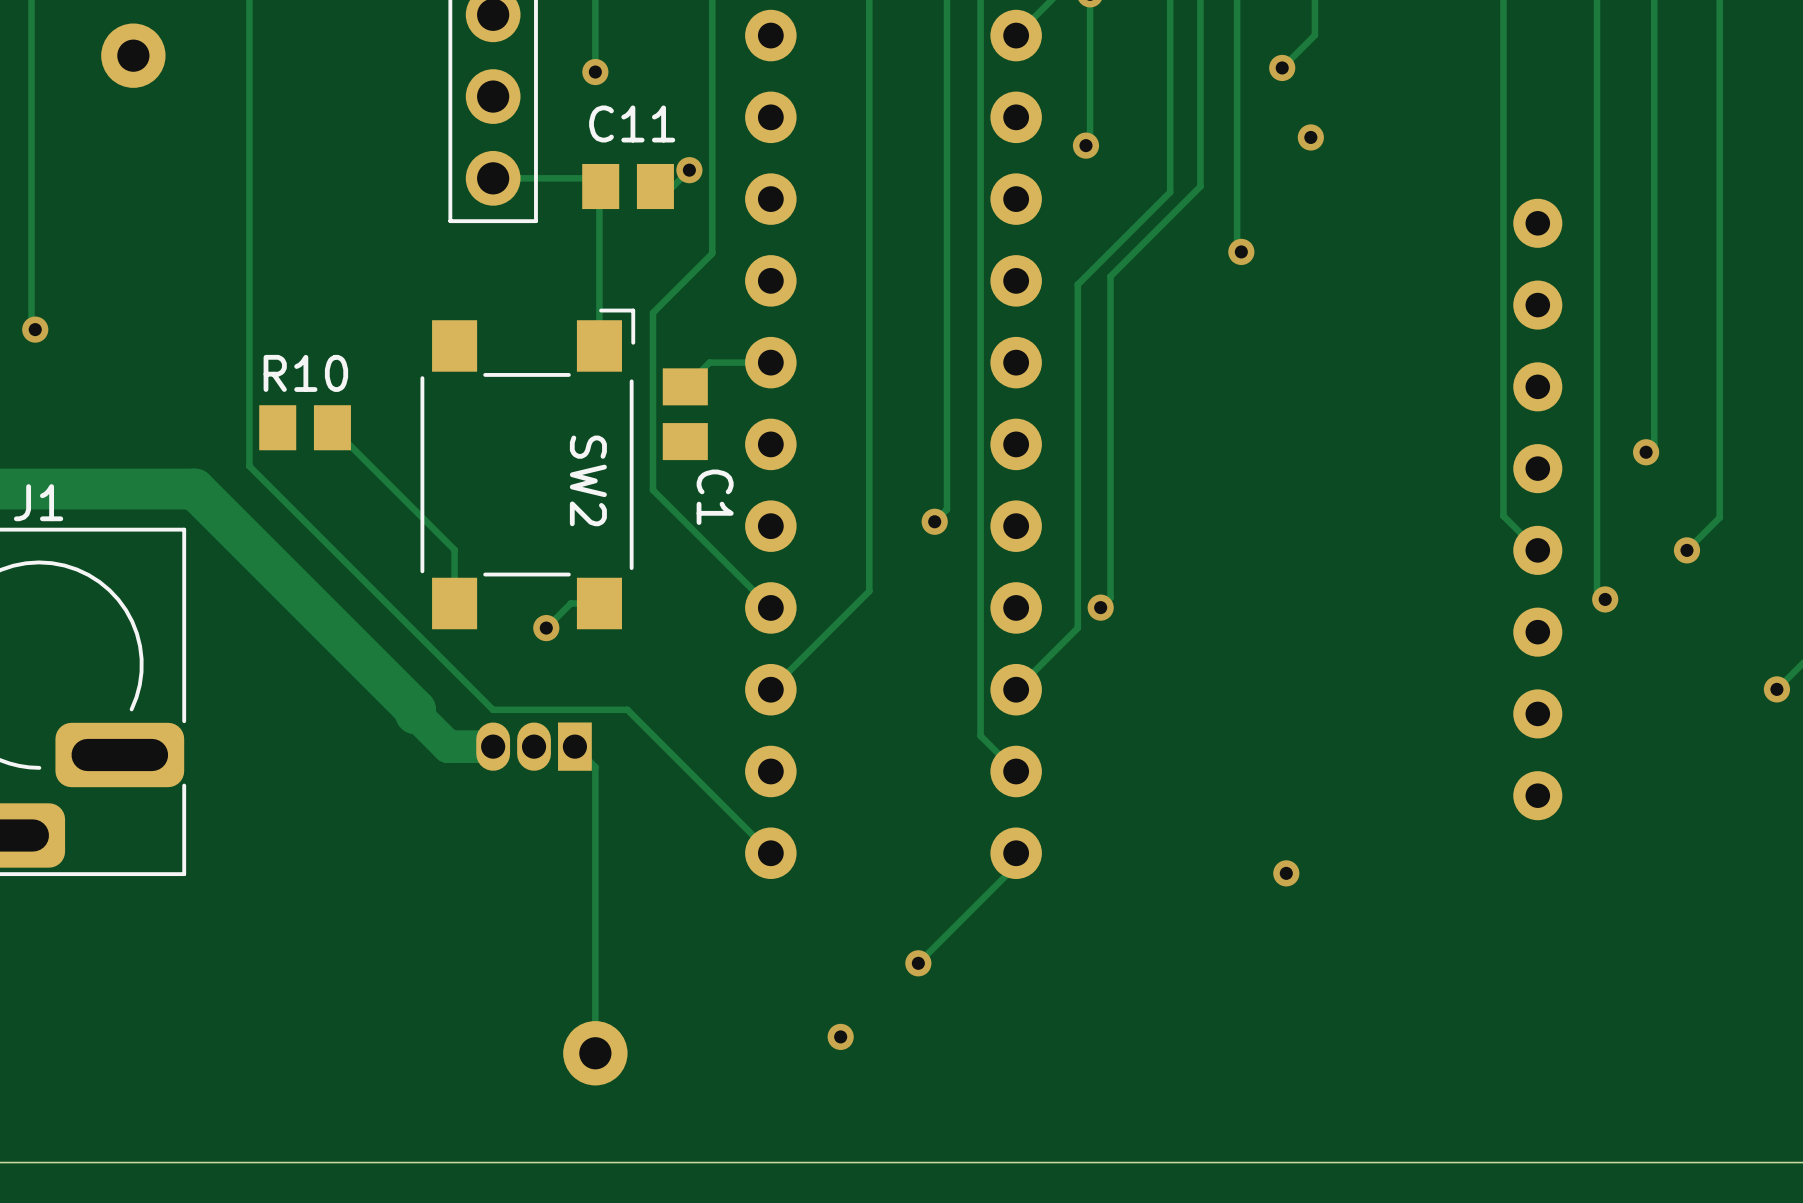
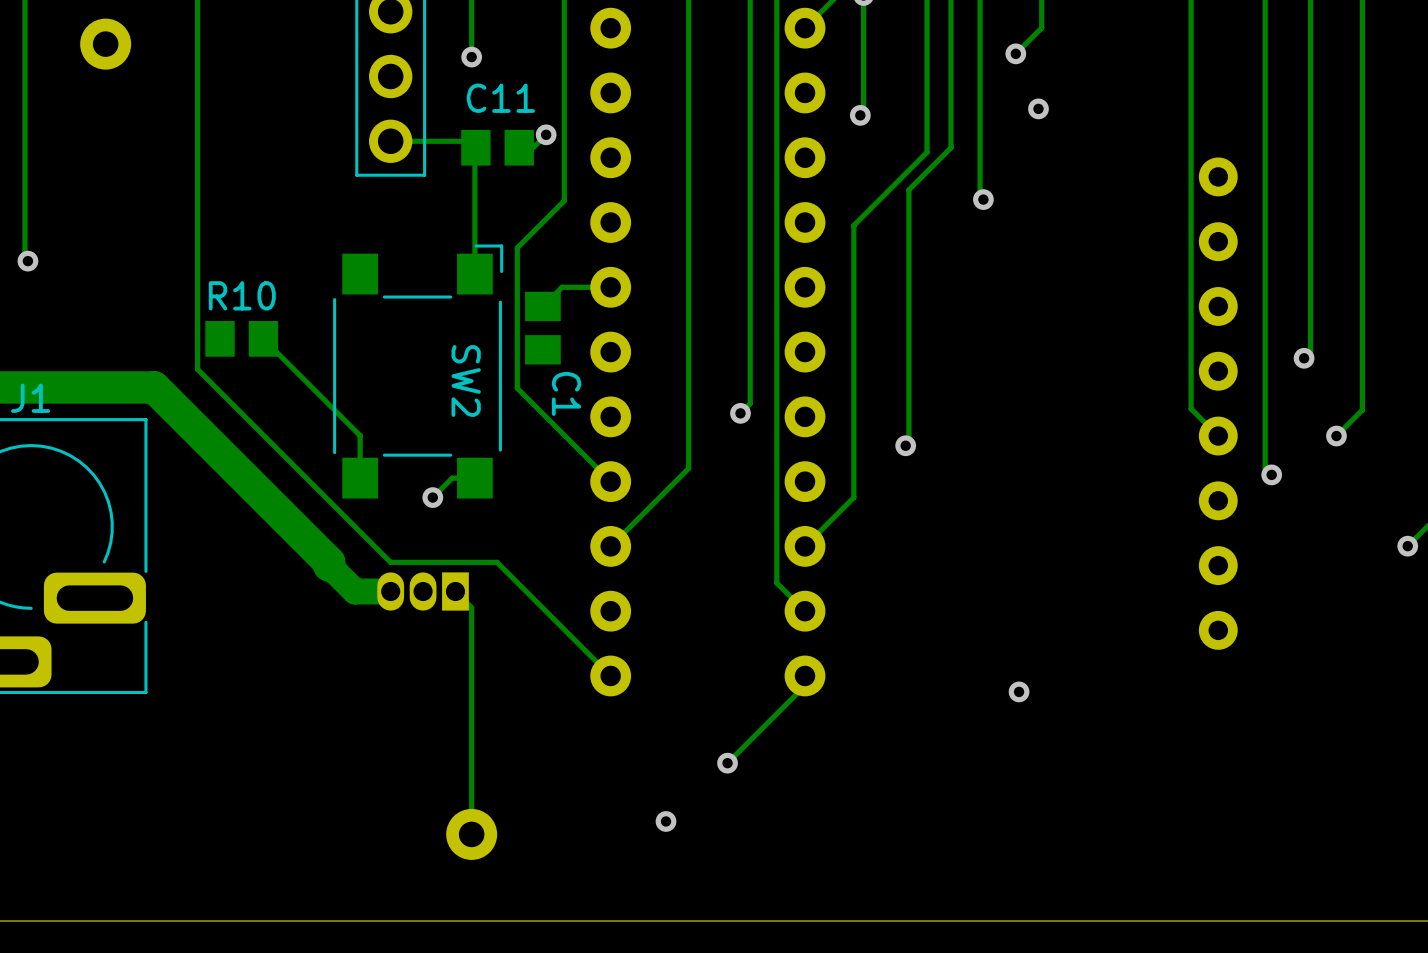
track: (1147, 239) (1110, 276) (1110, 597) (1100, 607) -> (908, 189) (908, 442) (905, 445)
via position: (1100, 607) -> (905, 445)

